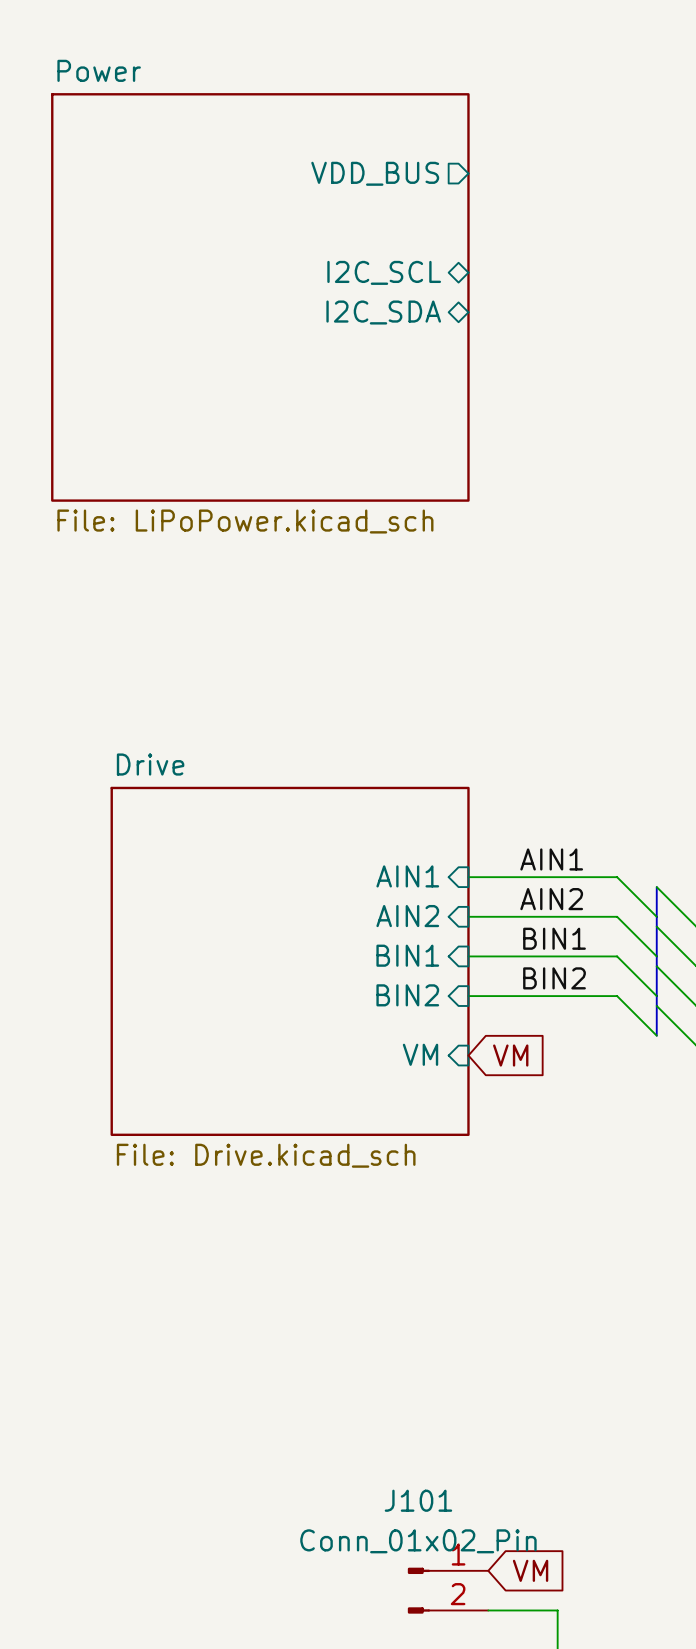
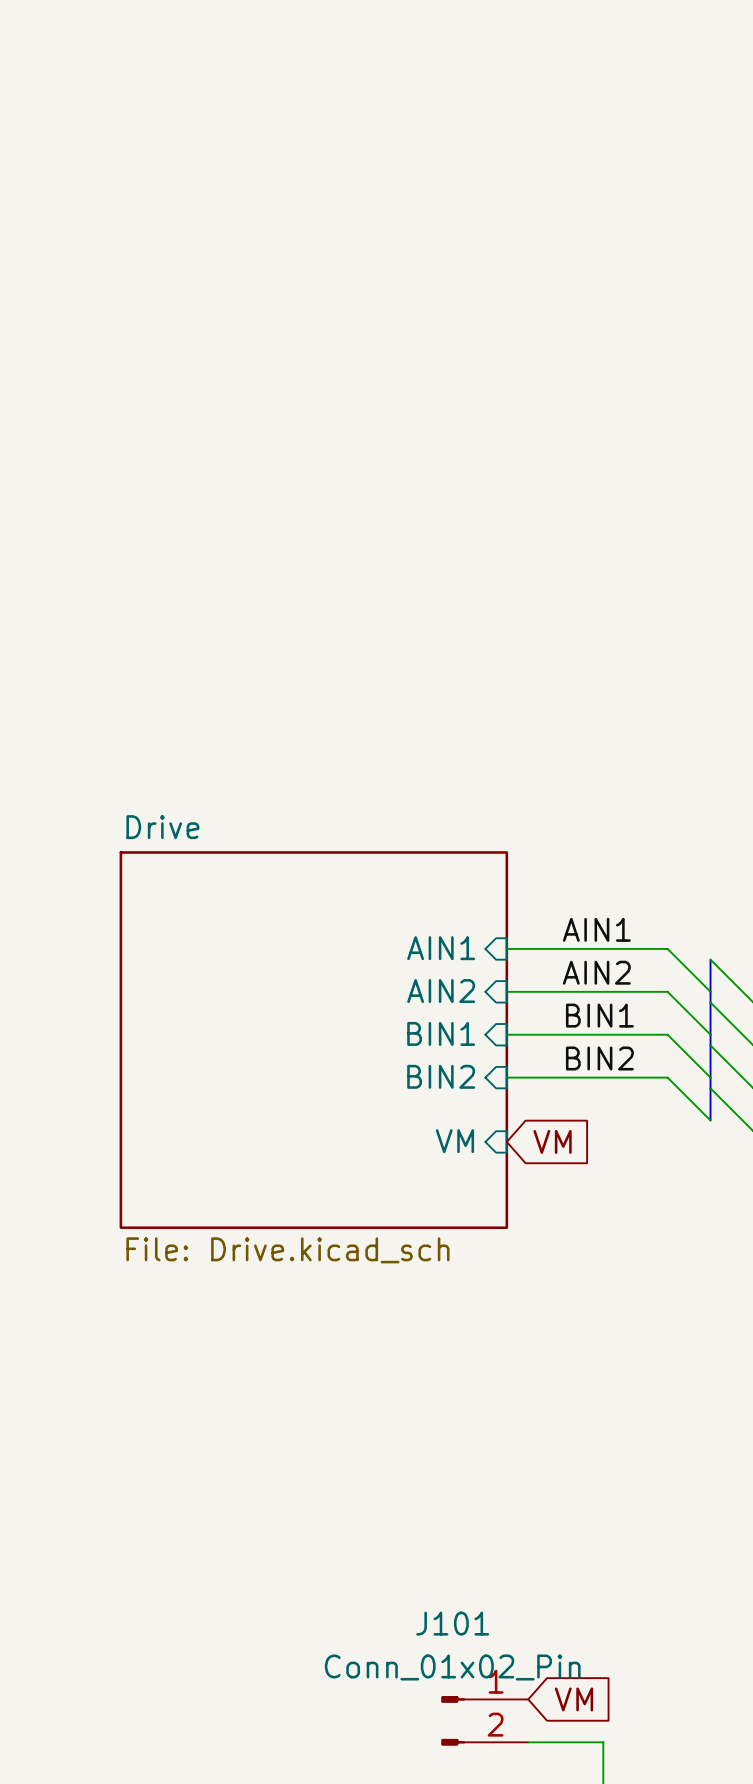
sheet pin: VDD_BUS (375, 173) -> none
sheet pin: I2C_SCL (384, 272) -> none
sheet Power: File: LiPoPower.kicad_sch (260, 297) -> none
sheet pin: I2C_SDA (383, 312) -> none

